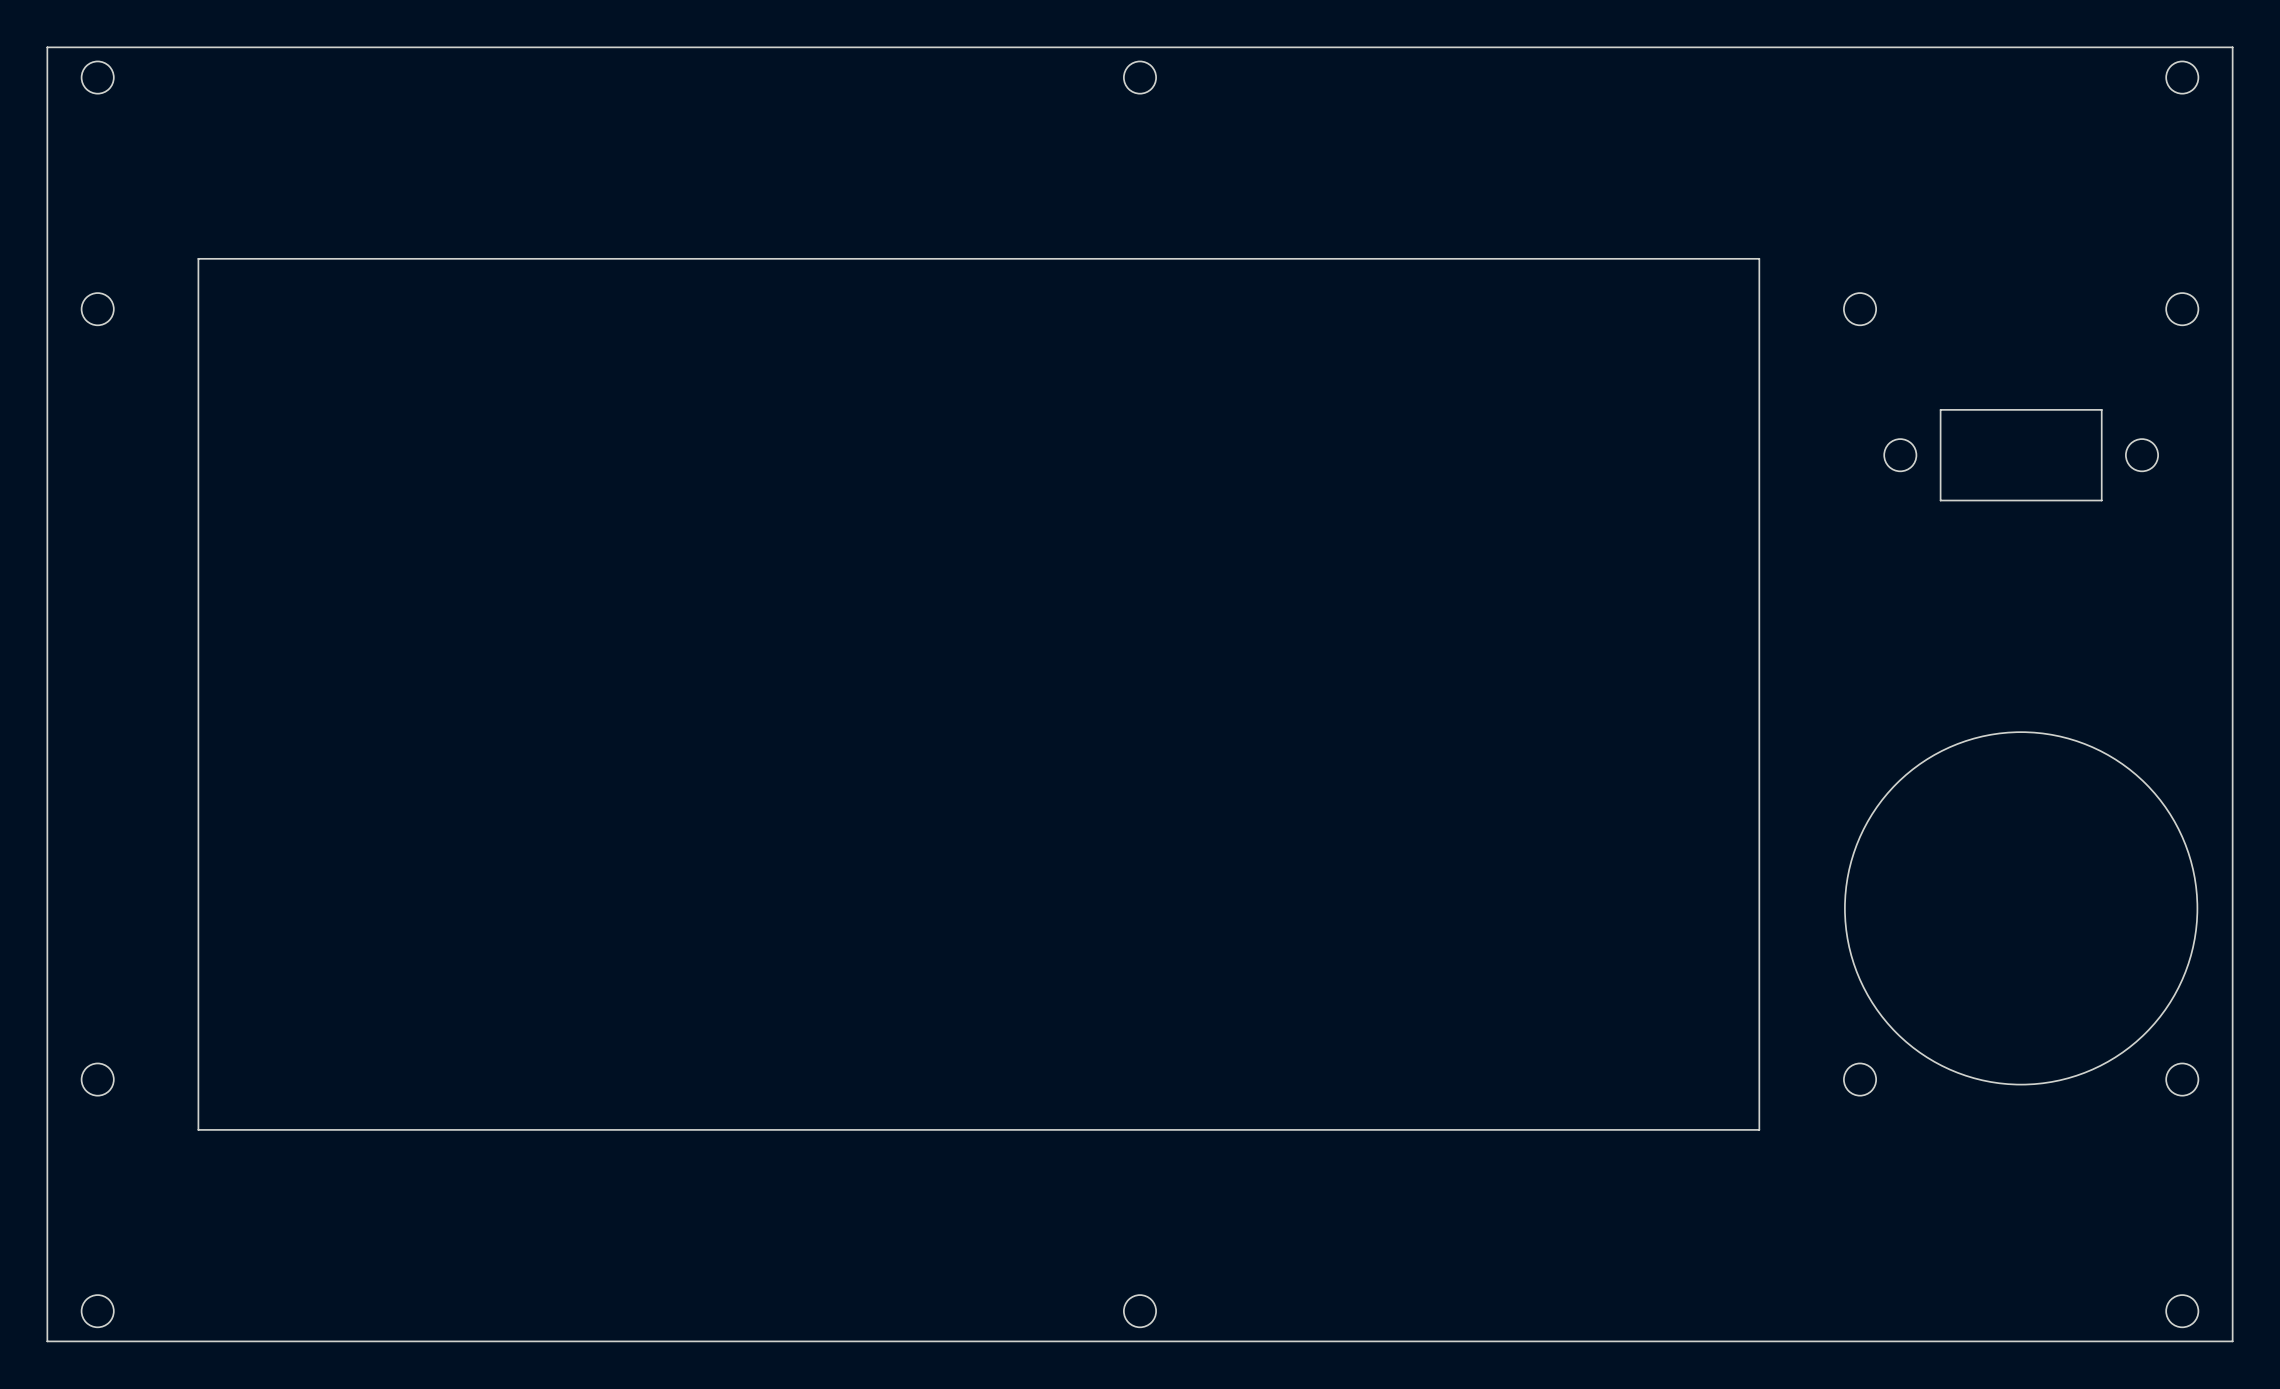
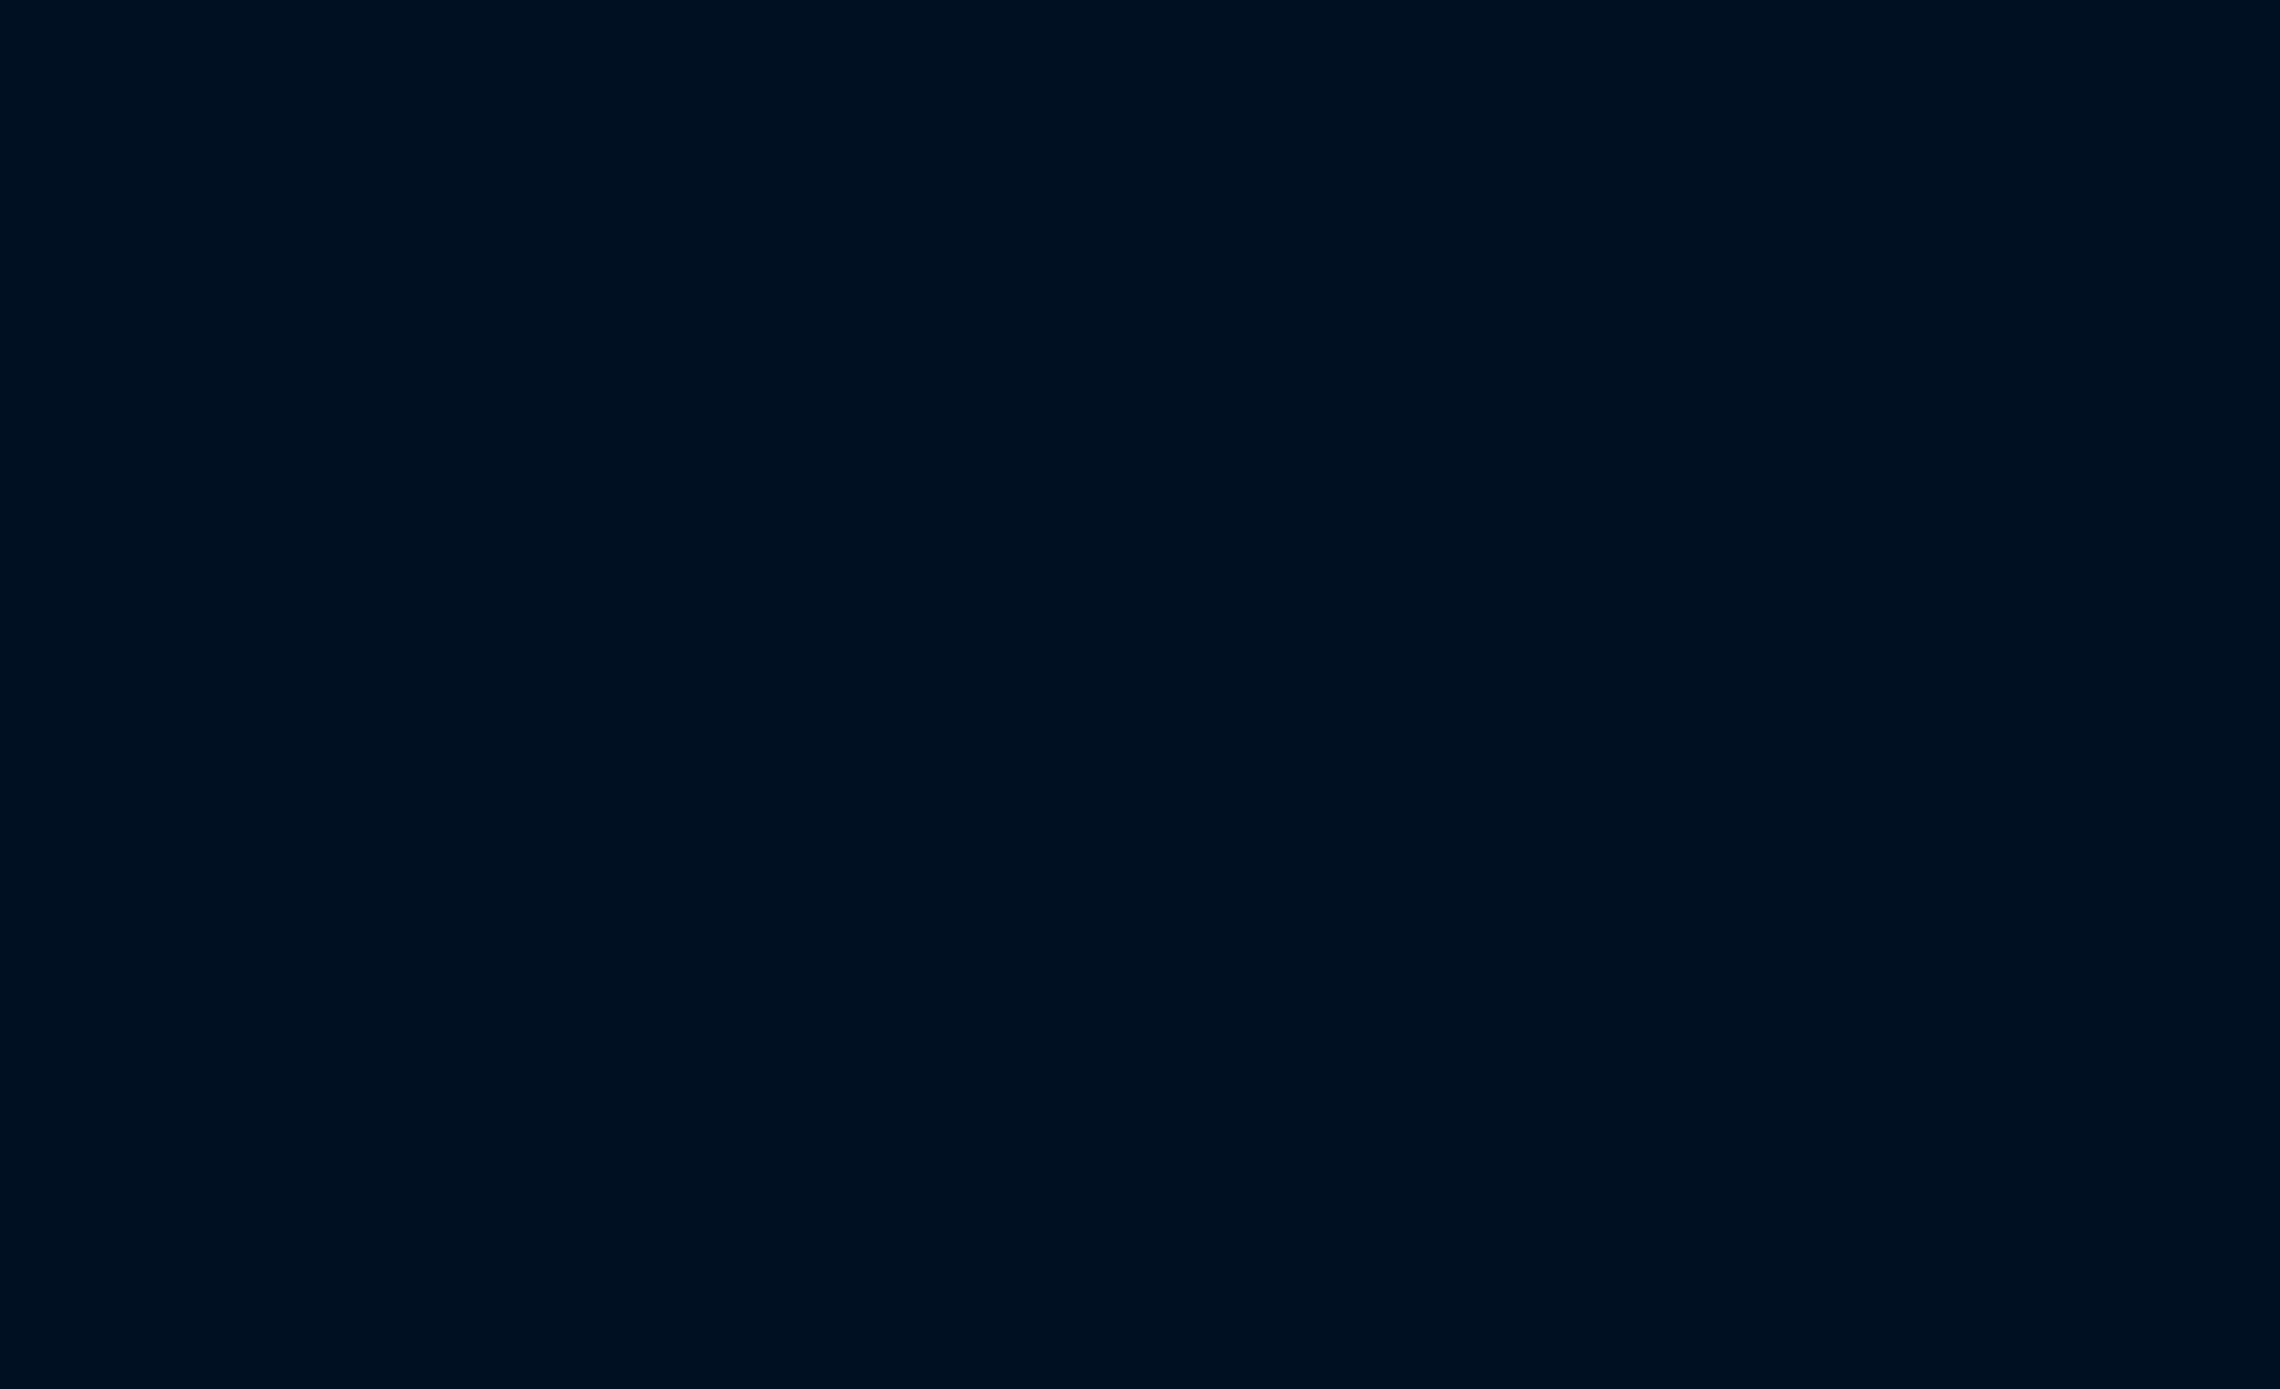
board edge: (47, 47) (47, 1341) (2232, 1341) (2232, 47) (47, 47) -> none
round board edge: [81, 60, 115, 95] -> none
round board edge: [1123, 60, 1157, 95] -> none
round board edge: [2165, 60, 2199, 95] -> none
board edge: (198, 258) (1759, 258) (1759, 1129) (198, 1129) (198, 258) -> none
round board edge: [81, 292, 115, 326] -> none
round board edge: [1843, 292, 1877, 326] -> none
round board edge: [2165, 292, 2199, 326] -> none
board edge: (1940, 409) (2101, 409) (2101, 500) (1940, 500) (1940, 409) -> none
round board edge: [1883, 438, 1917, 472] -> none
round board edge: [2125, 438, 2159, 472] -> none
round board edge: [1844, 731, 2198, 1086] -> none
round board edge: [81, 1062, 115, 1097] -> none
round board edge: [1843, 1062, 1877, 1097] -> none
round board edge: [2165, 1062, 2199, 1097] -> none
round board edge: [81, 1294, 115, 1328] -> none
round board edge: [1123, 1294, 1157, 1328] -> none
round board edge: [2165, 1294, 2199, 1328] -> none

